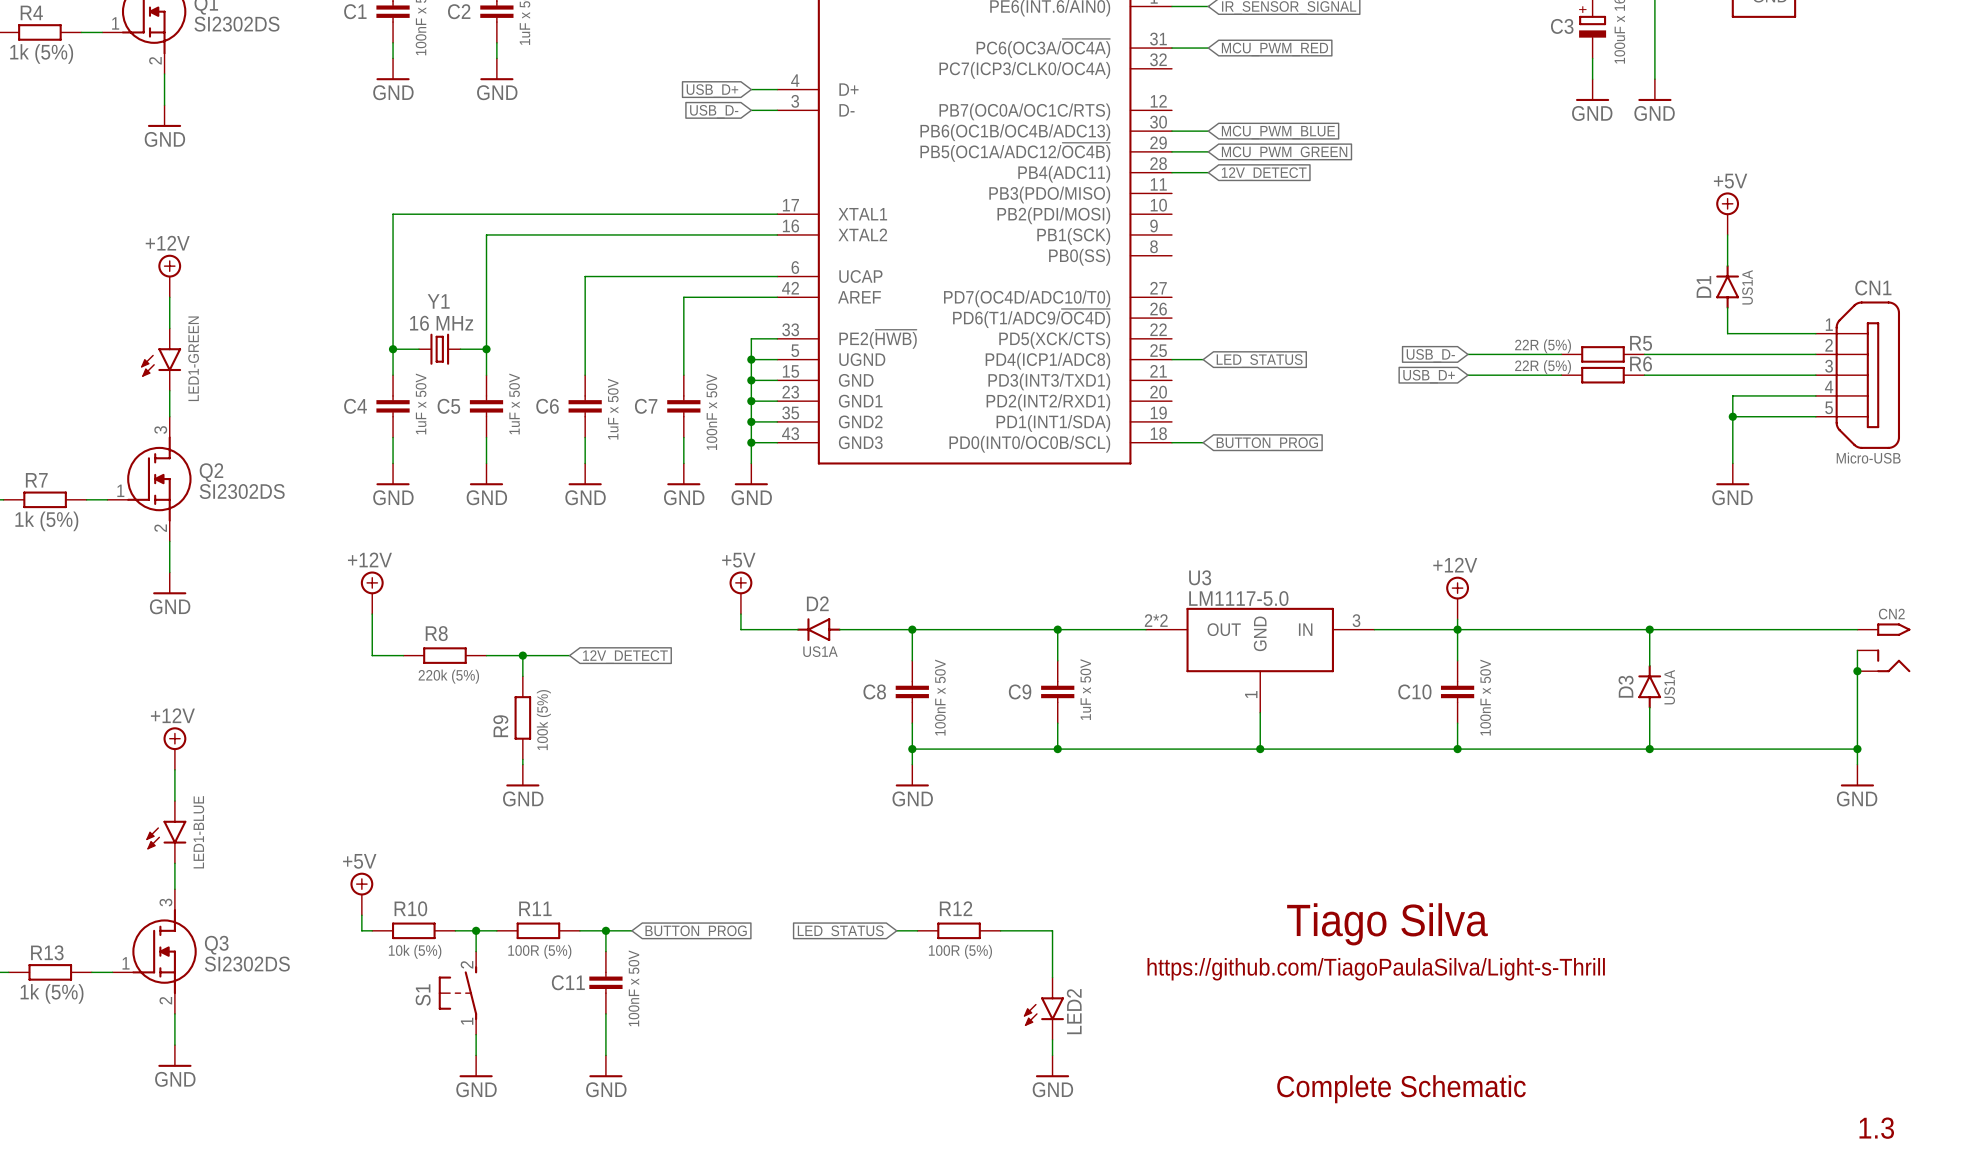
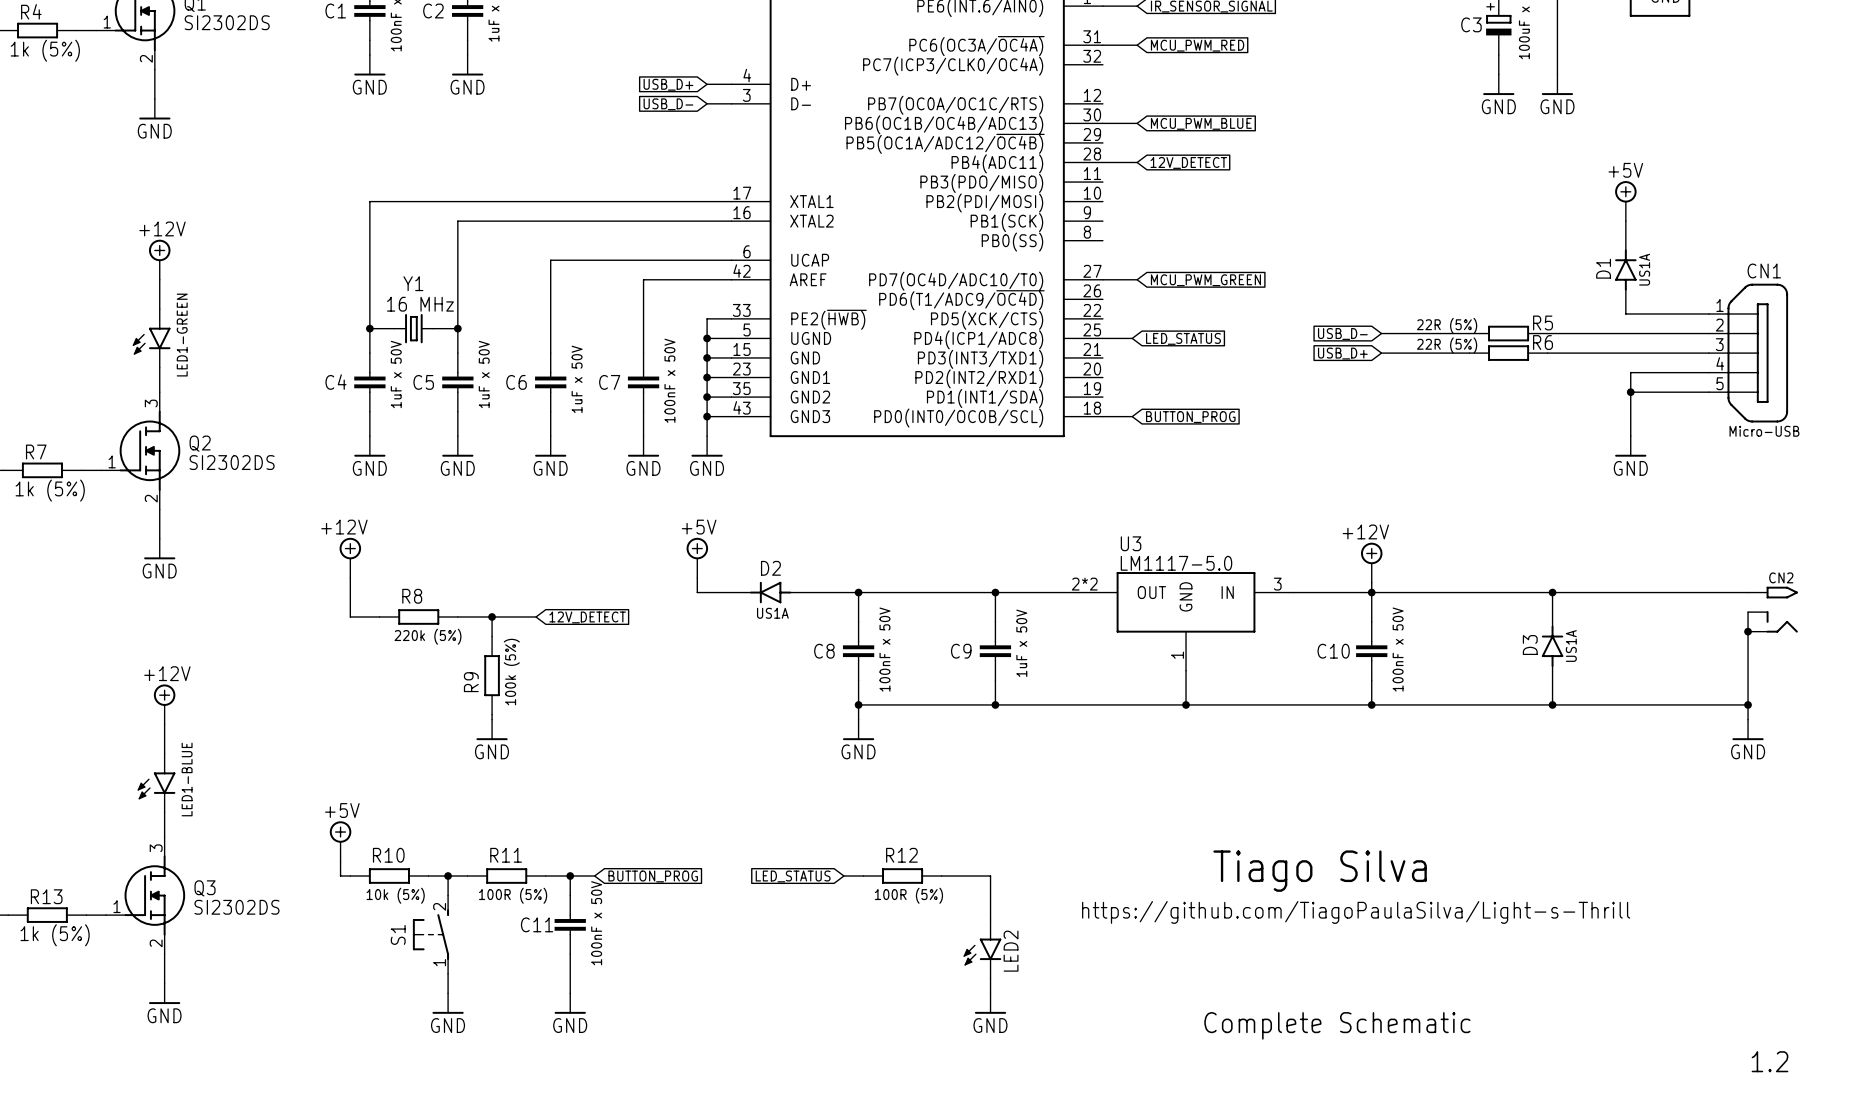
wire: (1171, 151) (1208, 151) -> (1102, 279) (1137, 279)
global label position: MCU_PWM_GREEN (1284, 153) -> MCU_PWM_GREEN (1205, 280)
text: 1.3 (1876, 1128) -> 1.2 (1770, 1061)

